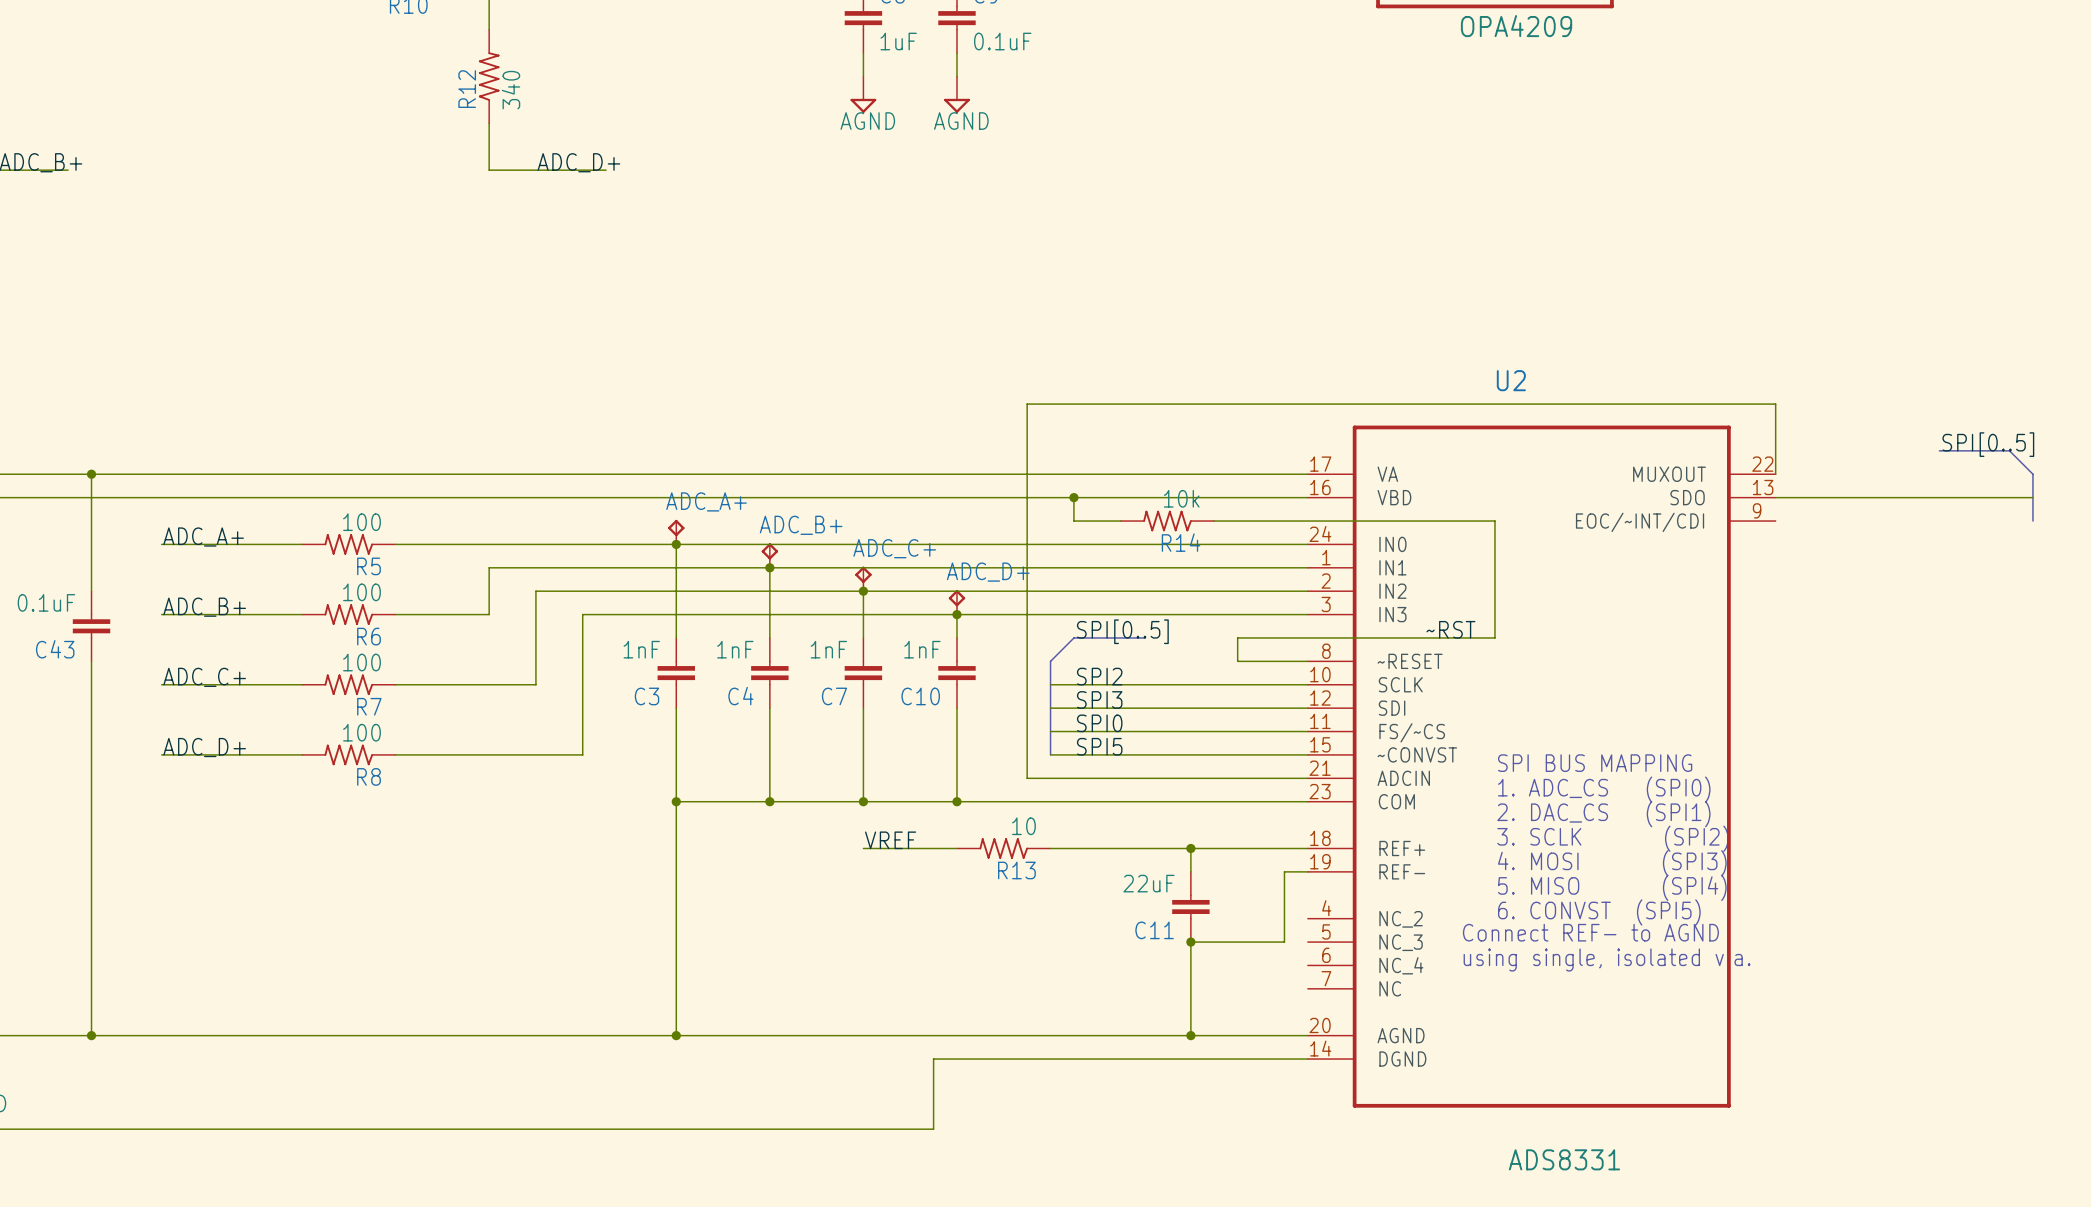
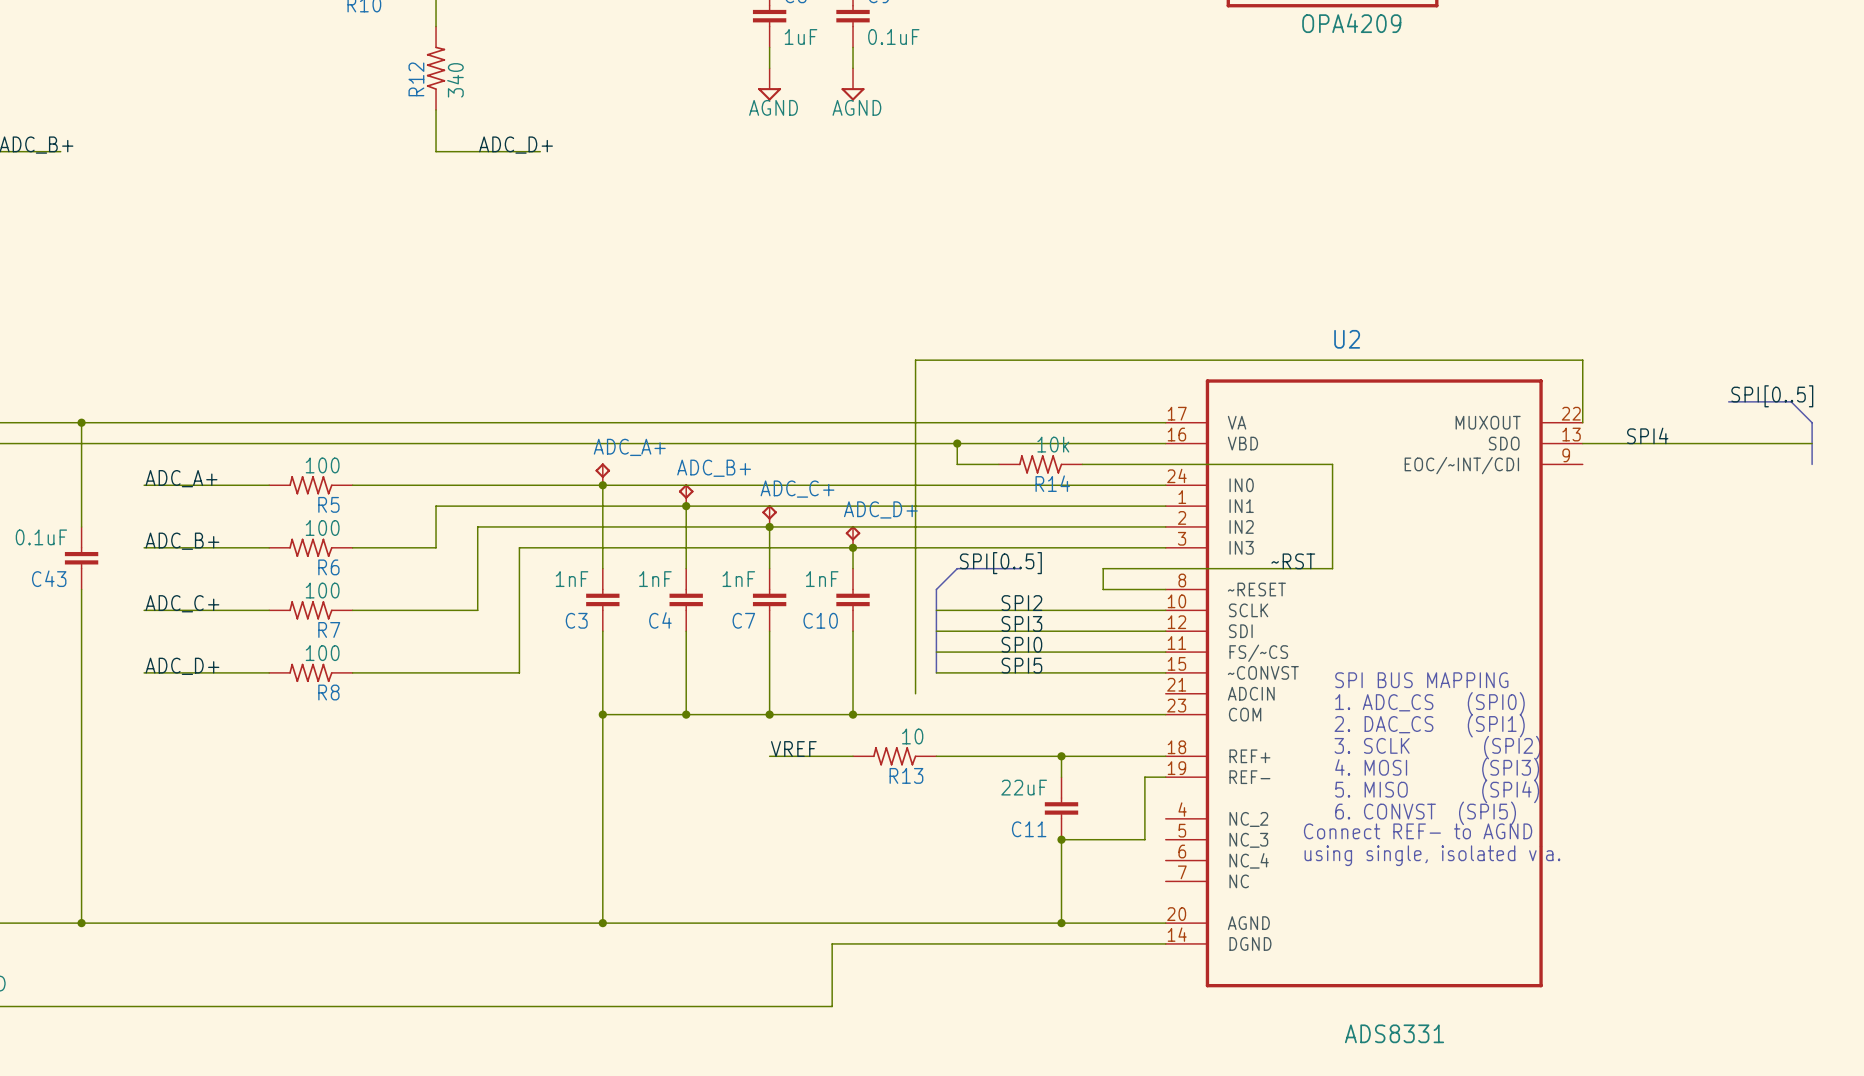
label: none -> SPI4 (1647, 435)
label position: SPI2 (1099, 676) -> SPI2 (1021, 603)
label position: SPI3 (1099, 699) -> SPI3 (1021, 623)
label position: SPI0 (1099, 723) -> SPI0 (1021, 644)
label position: SPI5 (1099, 746) -> SPI5 (1021, 665)
wire: (1027, 778) (1307, 778) -> none

